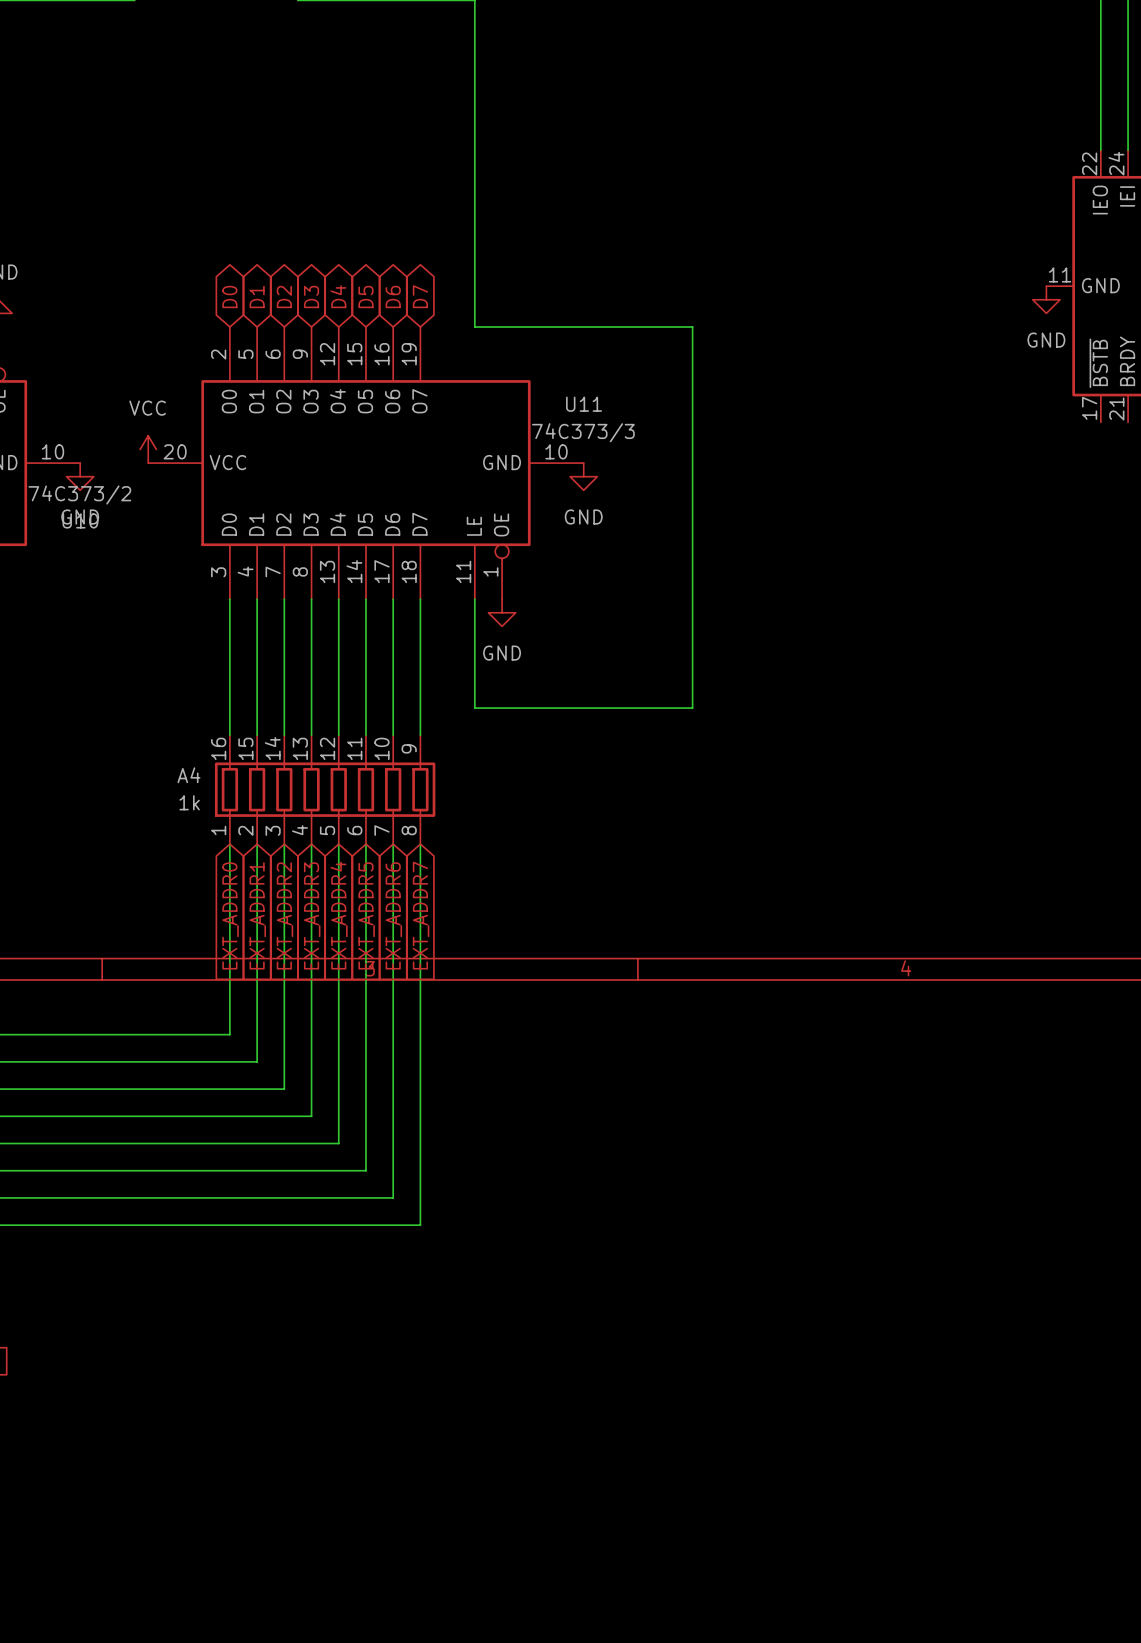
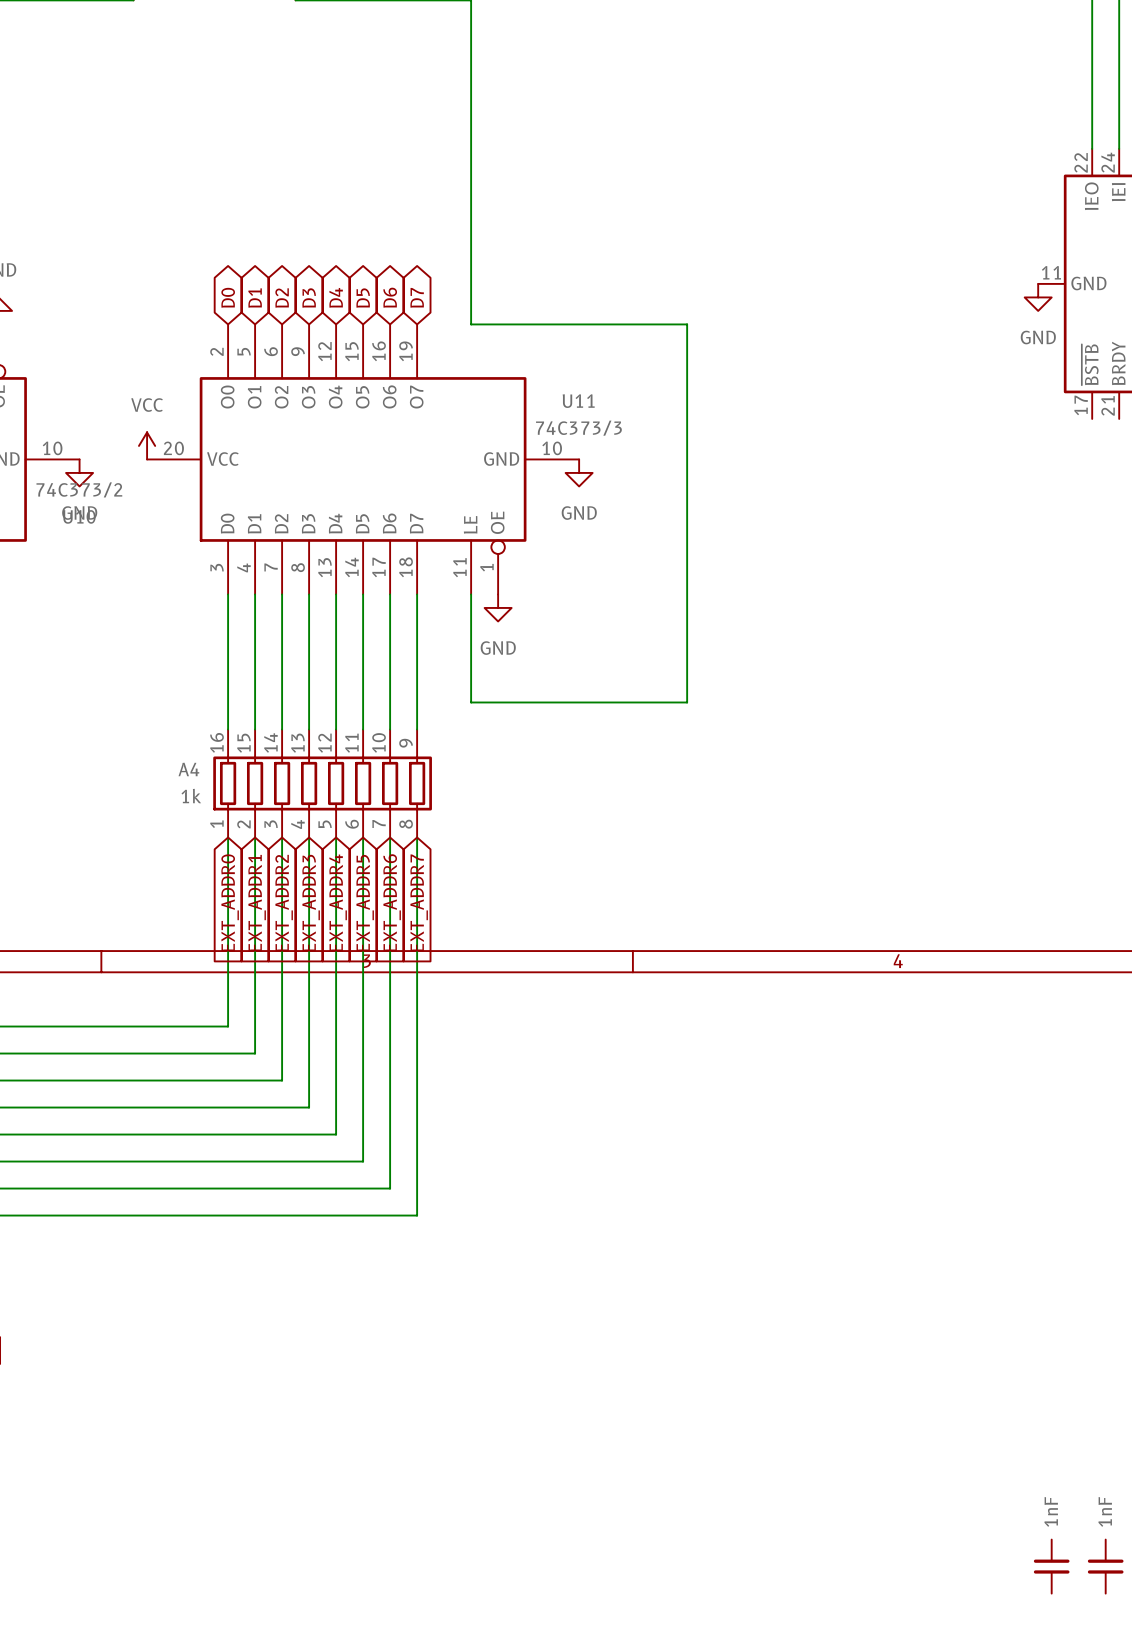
part: none -> 1nF (1051, 1566)
part: none -> 1nF (1105, 1566)

